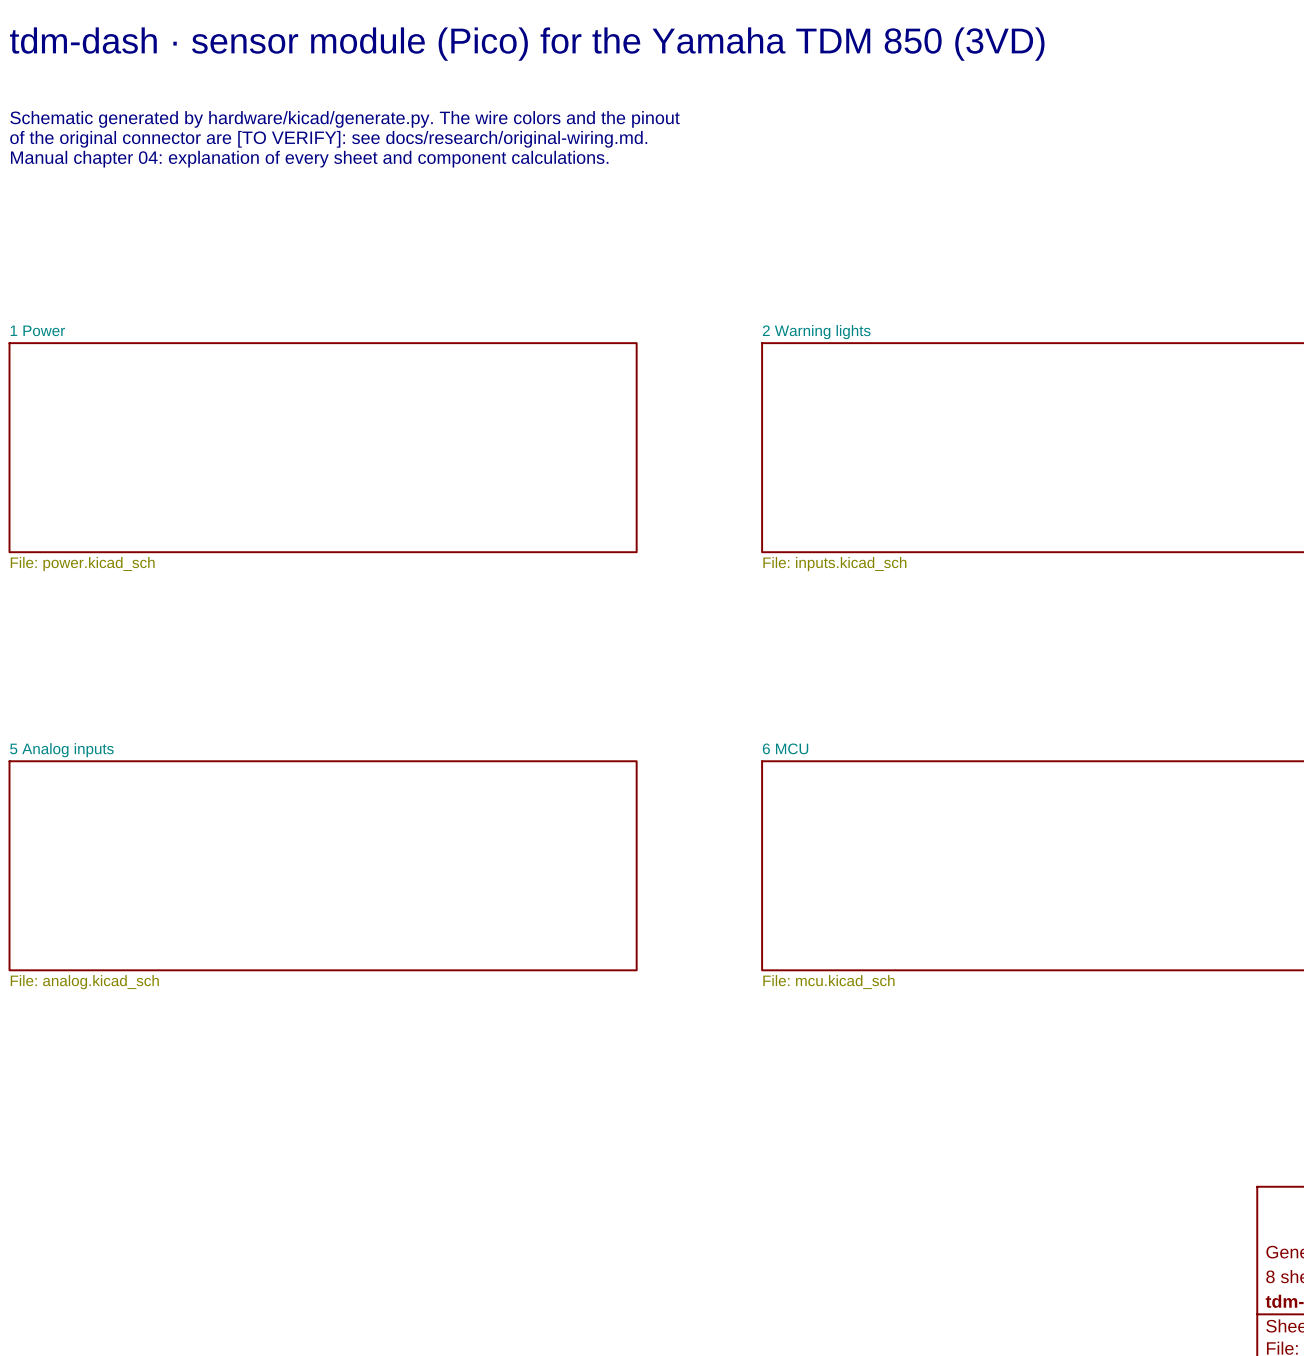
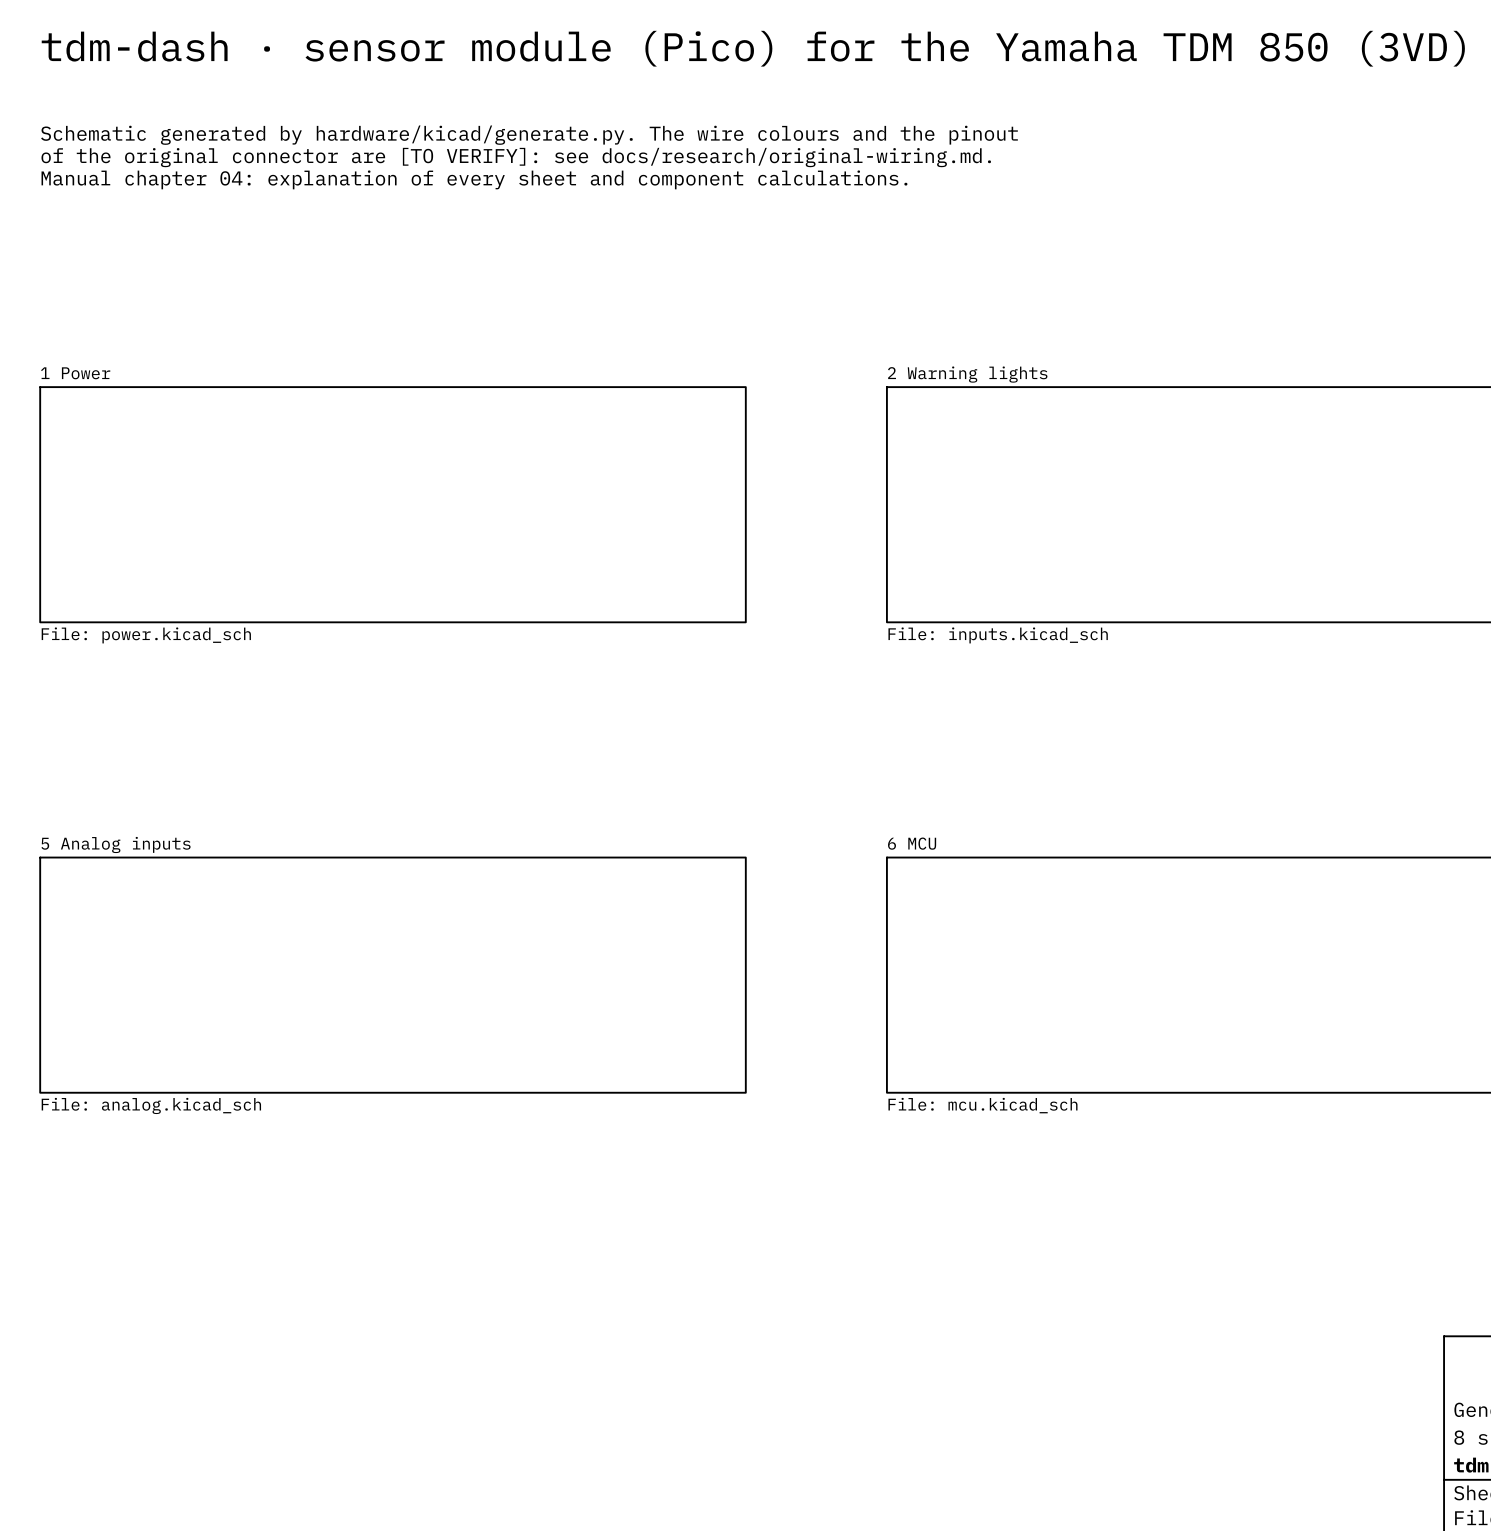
text: Schematic generated by hardware/kicad/generate.py. The wire colors and the pinout (345, 119) -> Schematic generated by hardware/kicad/generate.py. The wire colours and the pinout (529, 135)

